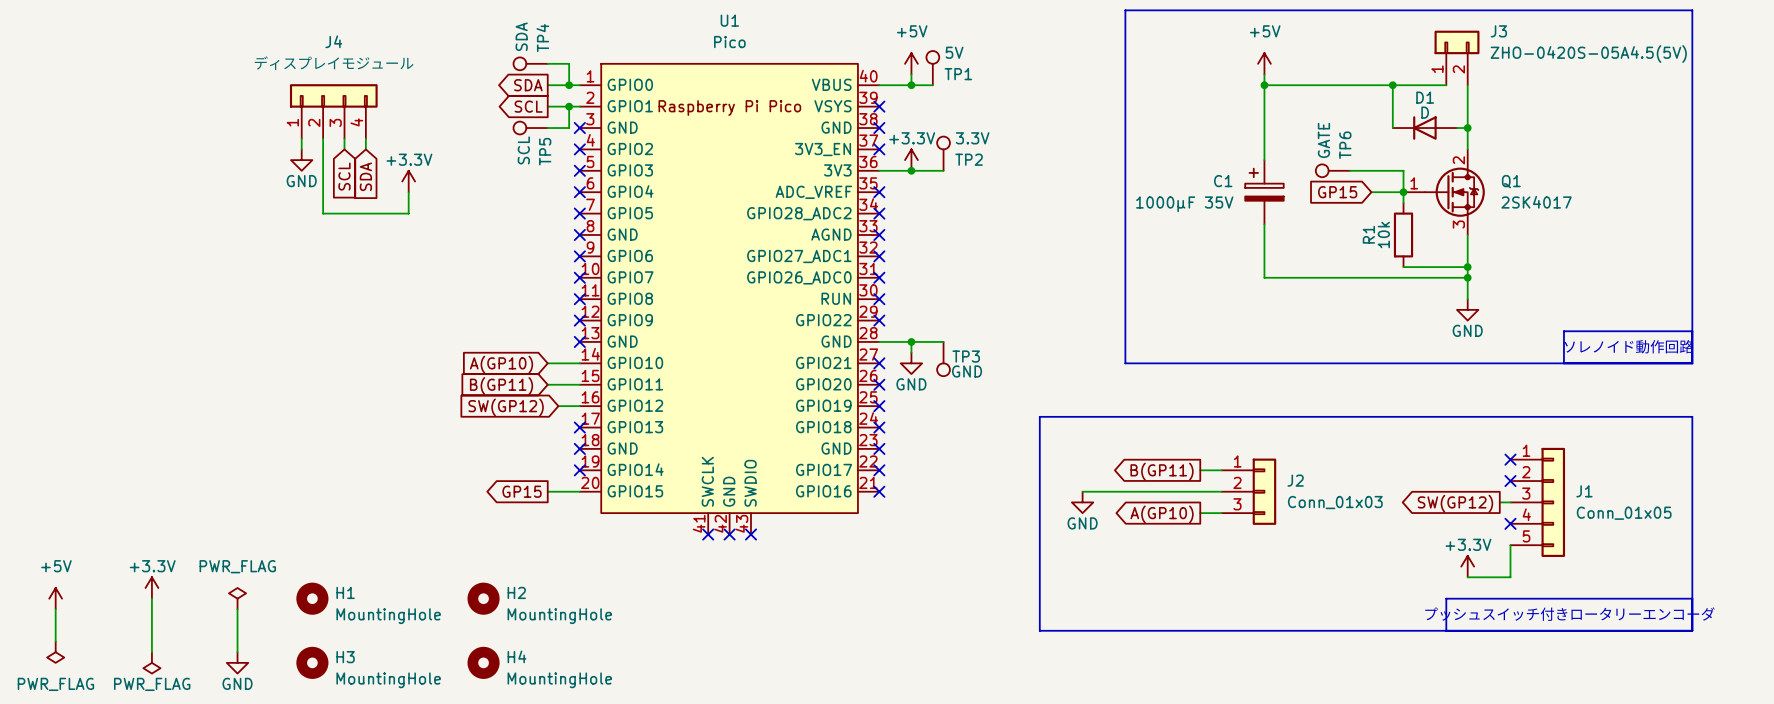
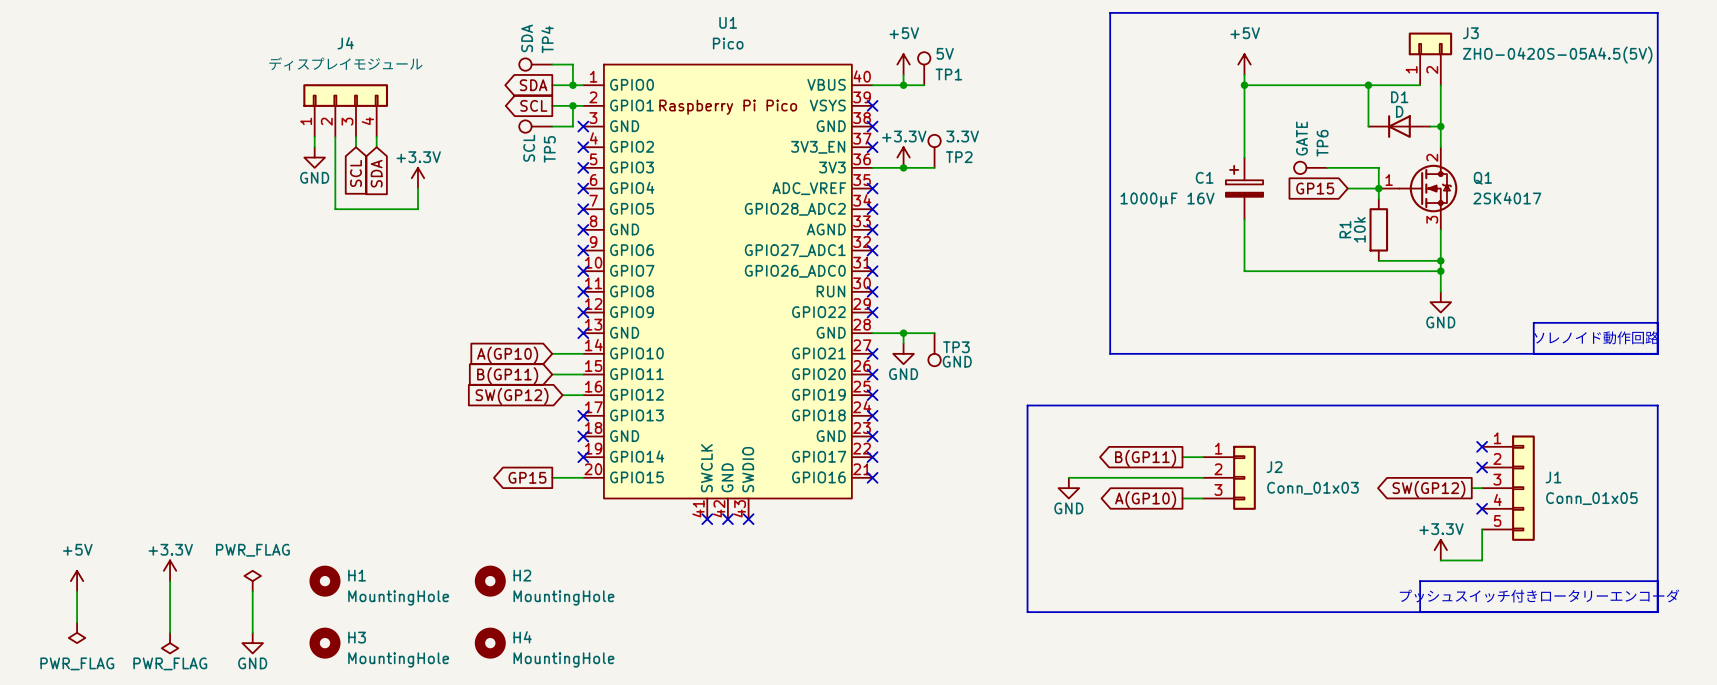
C1 value: 1000µF 35V (1184, 204) -> 1000µF 16V (1167, 200)

